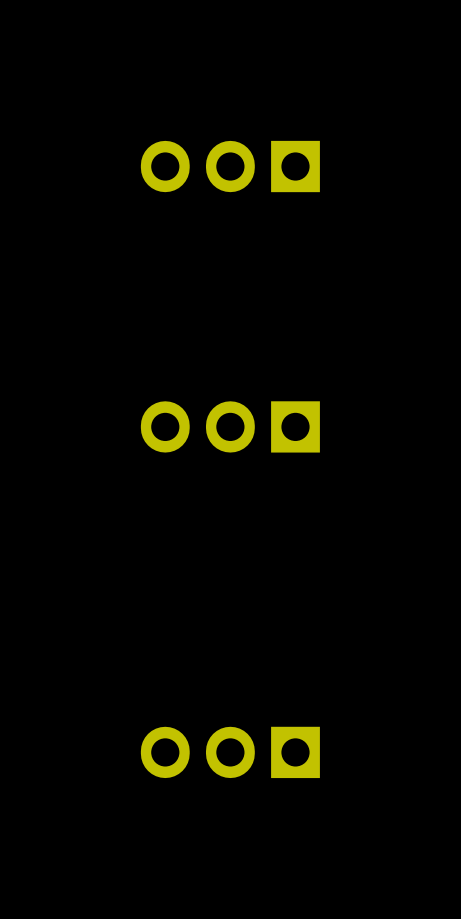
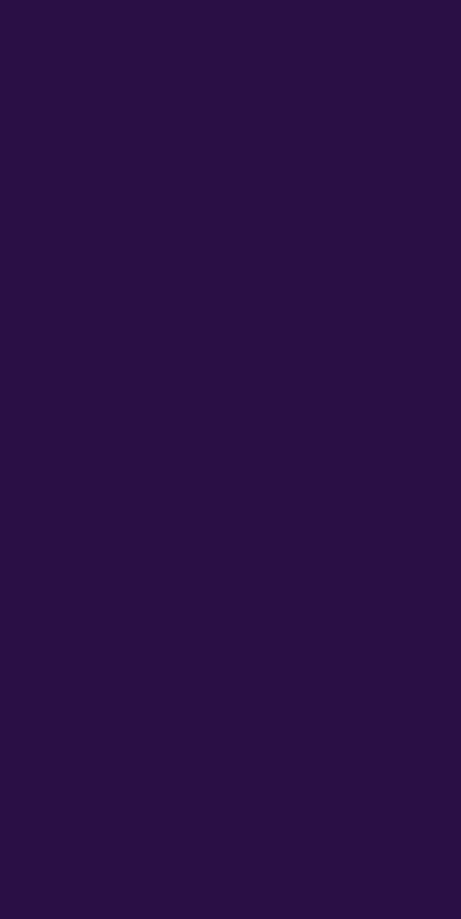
part: (230, 166) -> none
part: (230, 426) -> none
part: (230, 752) -> none

